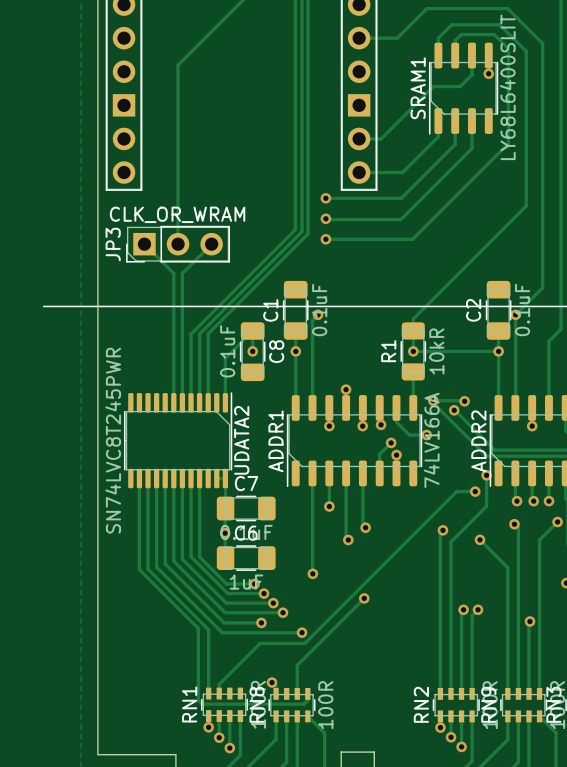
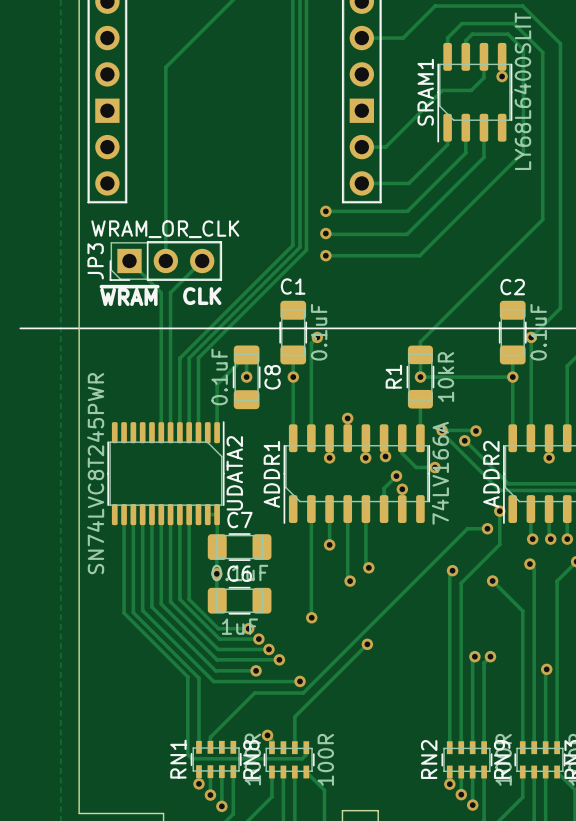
JP3 value: CLK_OR_WRAM (177, 214) -> WRAM_OR_CLK (165, 229)
text: none -> ~{WRAM} (129, 295)
text: none -> CLK (202, 296)
C1 name rotation: 0° (270, 310) -> 90° clockwise (293, 286)
C1 name position: C1 (270, 310) -> C1 (293, 286)
C2 name rotation: 0° (473, 310) -> 90° clockwise (512, 287)
C2 name position: C2 (473, 310) -> C2 (512, 287)

